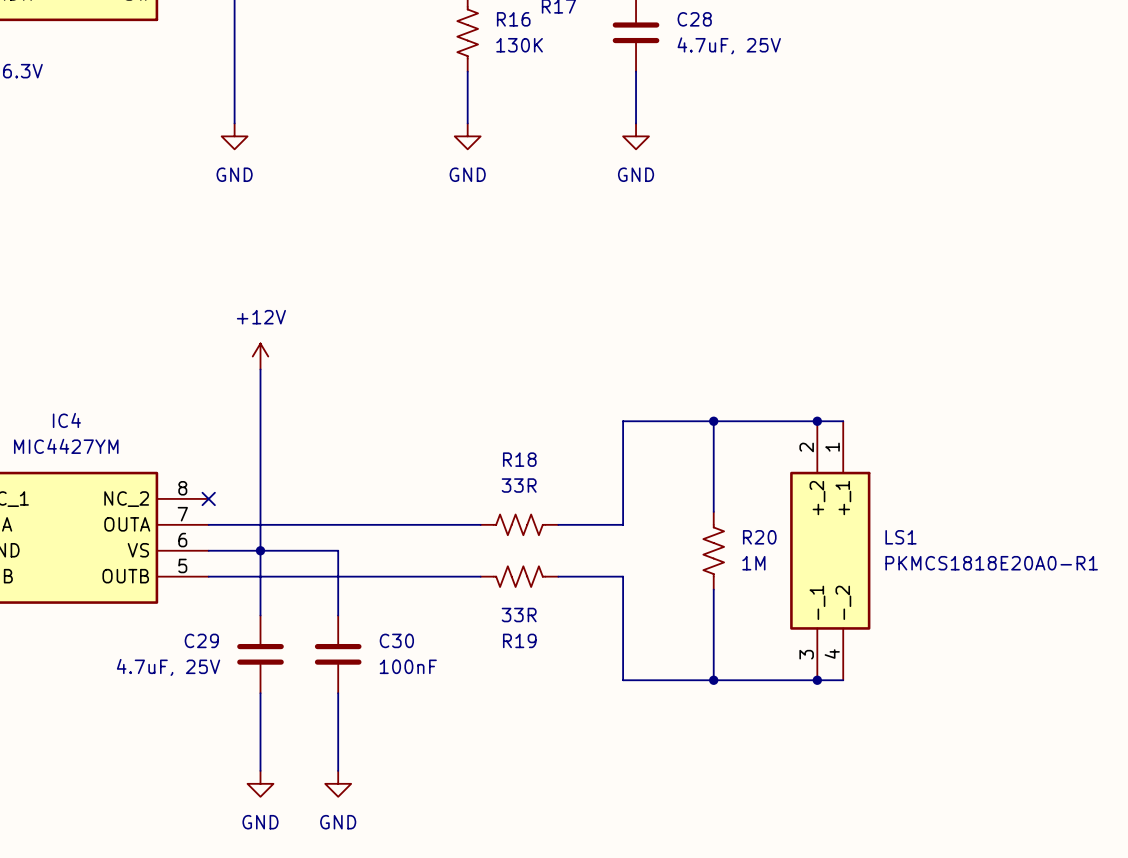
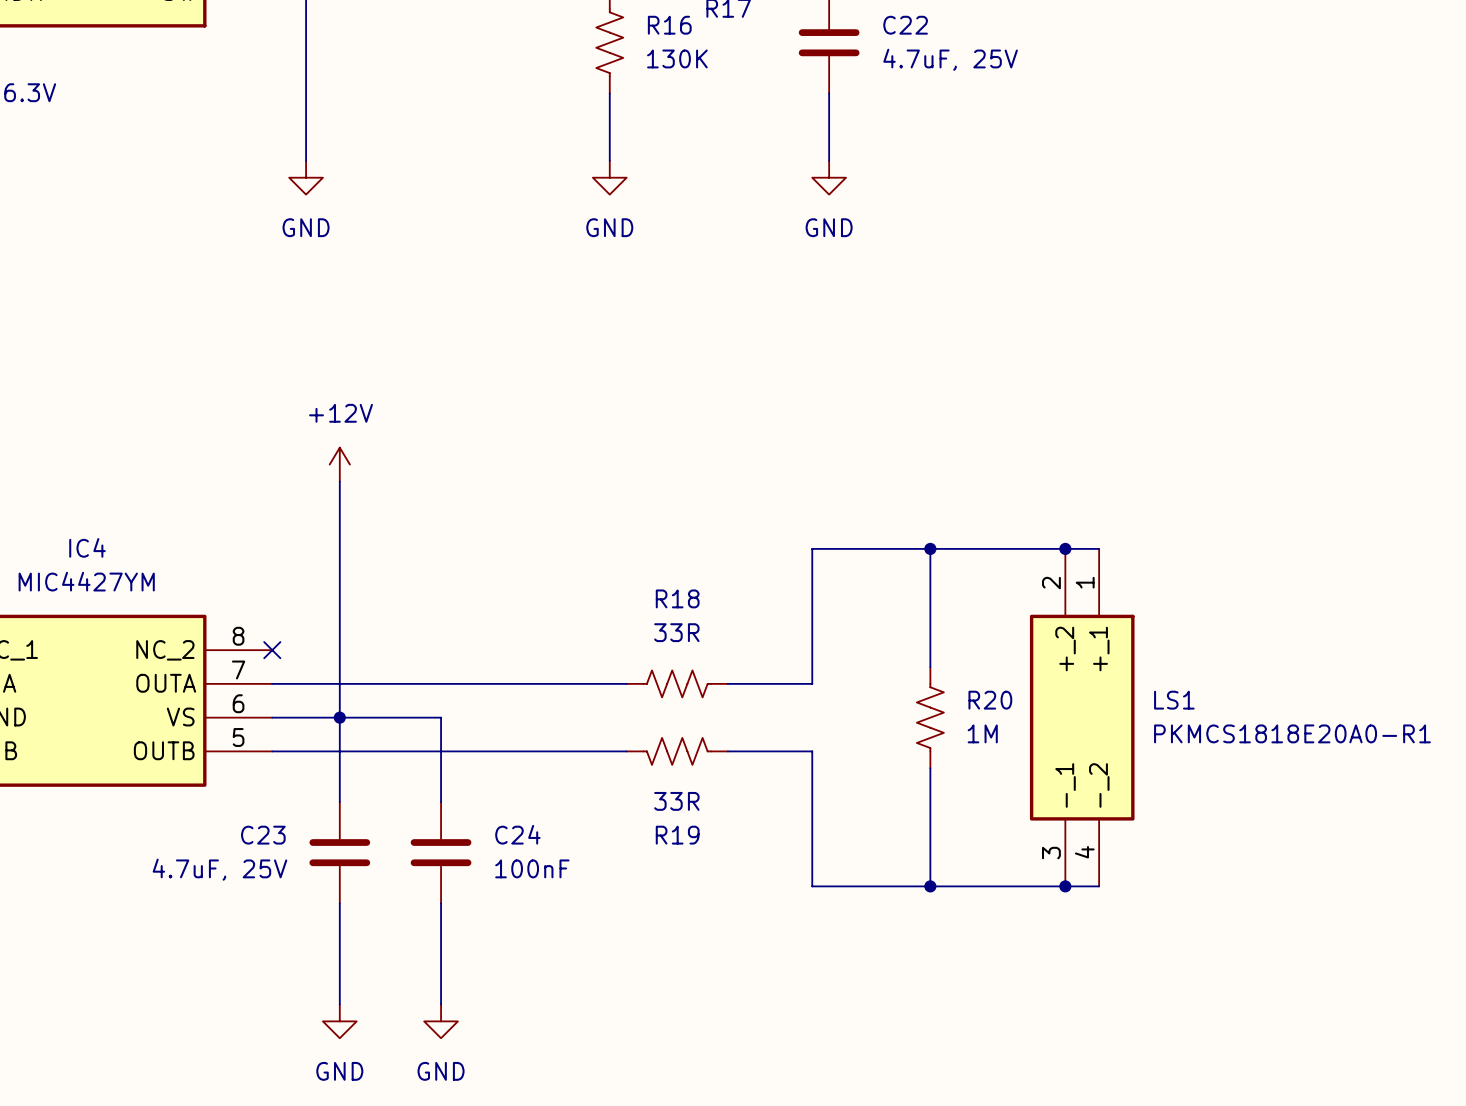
C28 name: C28 (694, 19) -> C22 (905, 25)
C29 name: C29 (201, 640) -> C23 (263, 835)
C30 name: C30 (396, 640) -> C24 (517, 834)

